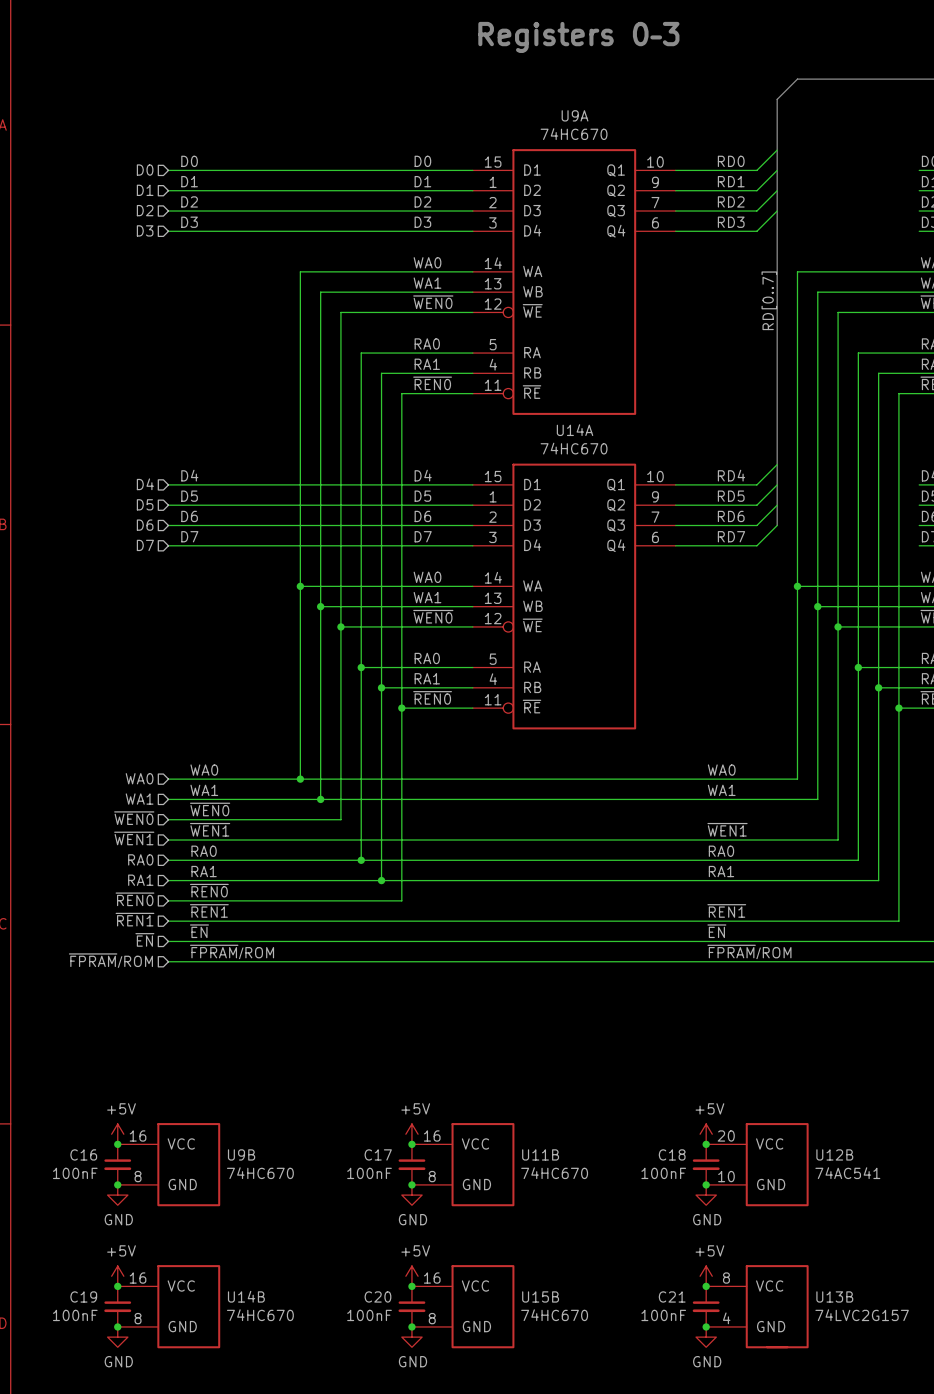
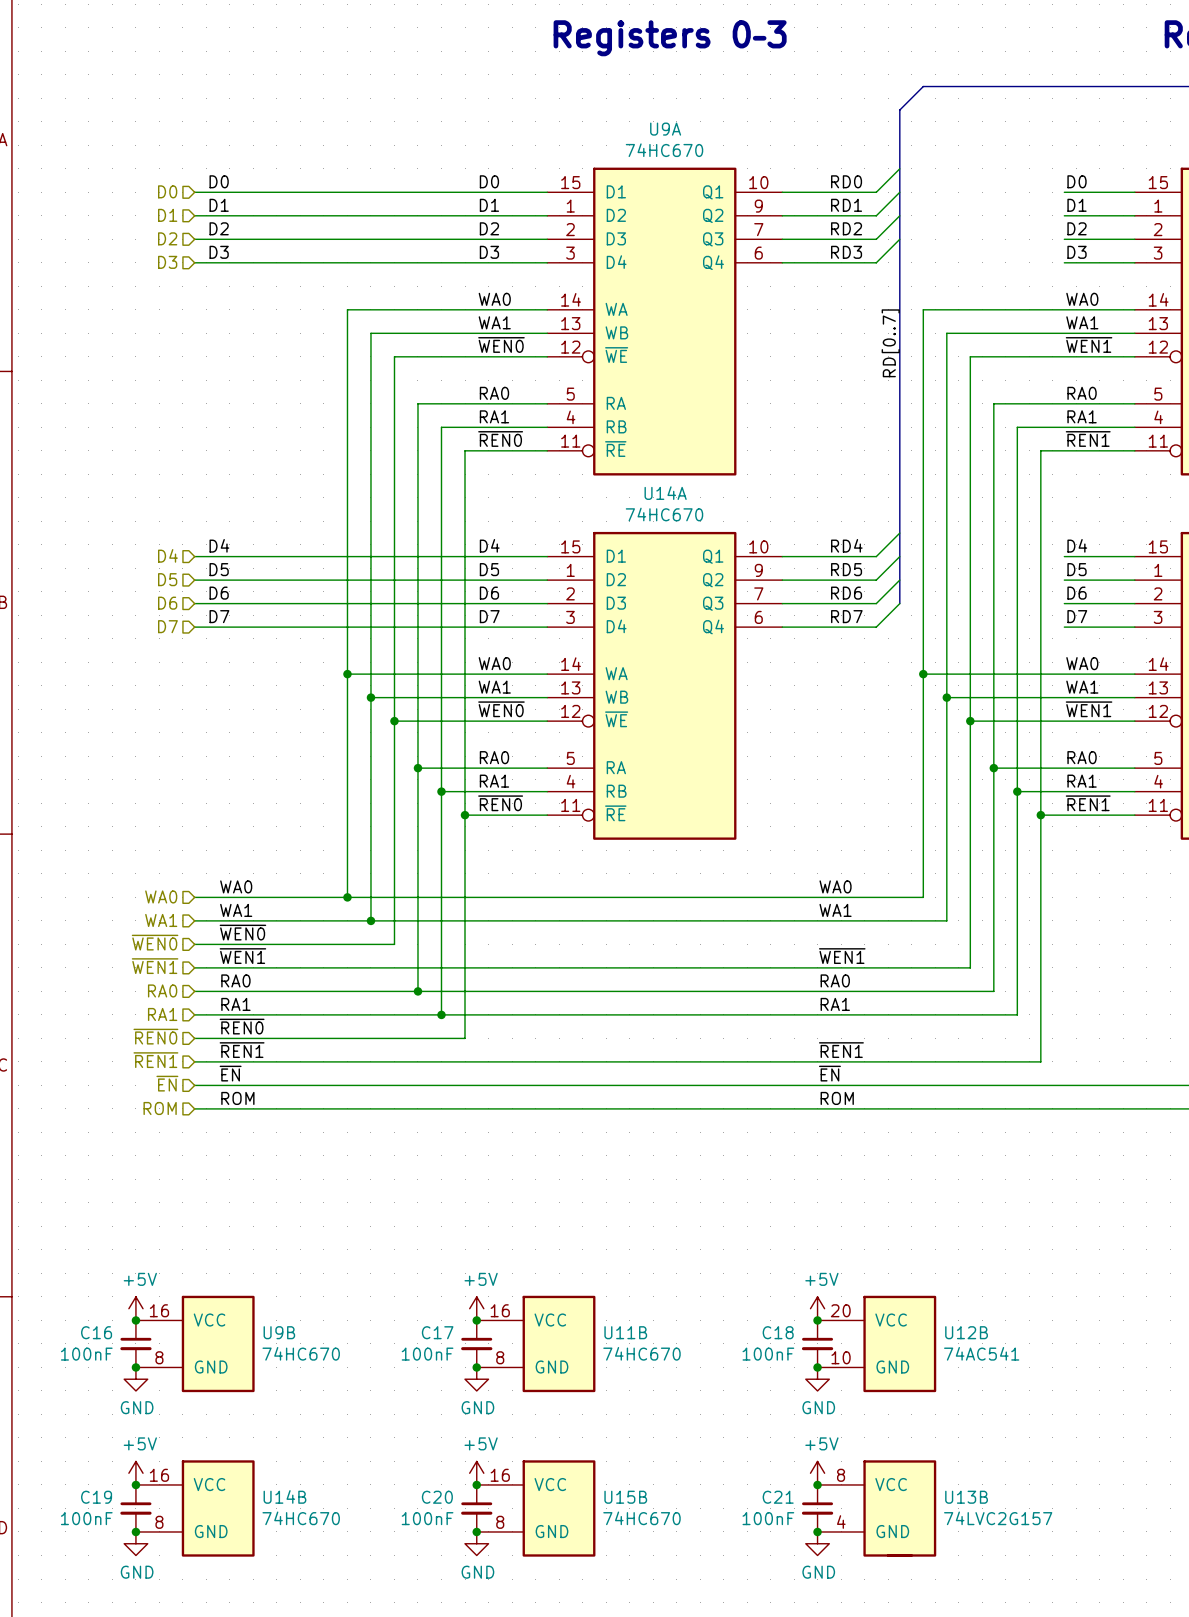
label: ~{FPRAM}∕ROM (232, 952) -> ROM (237, 1098)
label: ~{FPRAM}∕ROM (749, 952) -> ROM (837, 1098)
hierarchical label: ~{FPRAM}∕ROM (110, 960) -> ROM (160, 1108)

